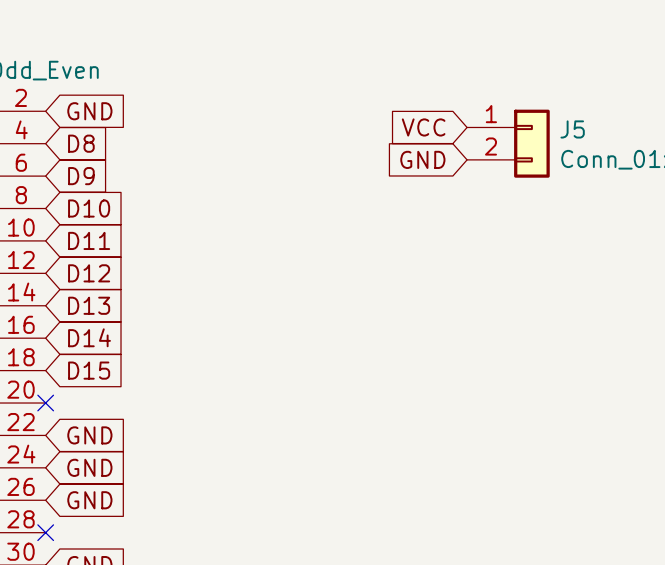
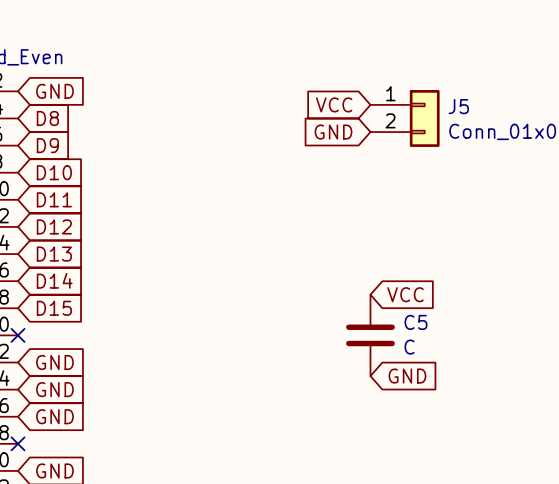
global label: none -> VCC (405, 294)
C5: none -> C (370, 335)
global label: none -> GND (407, 376)

